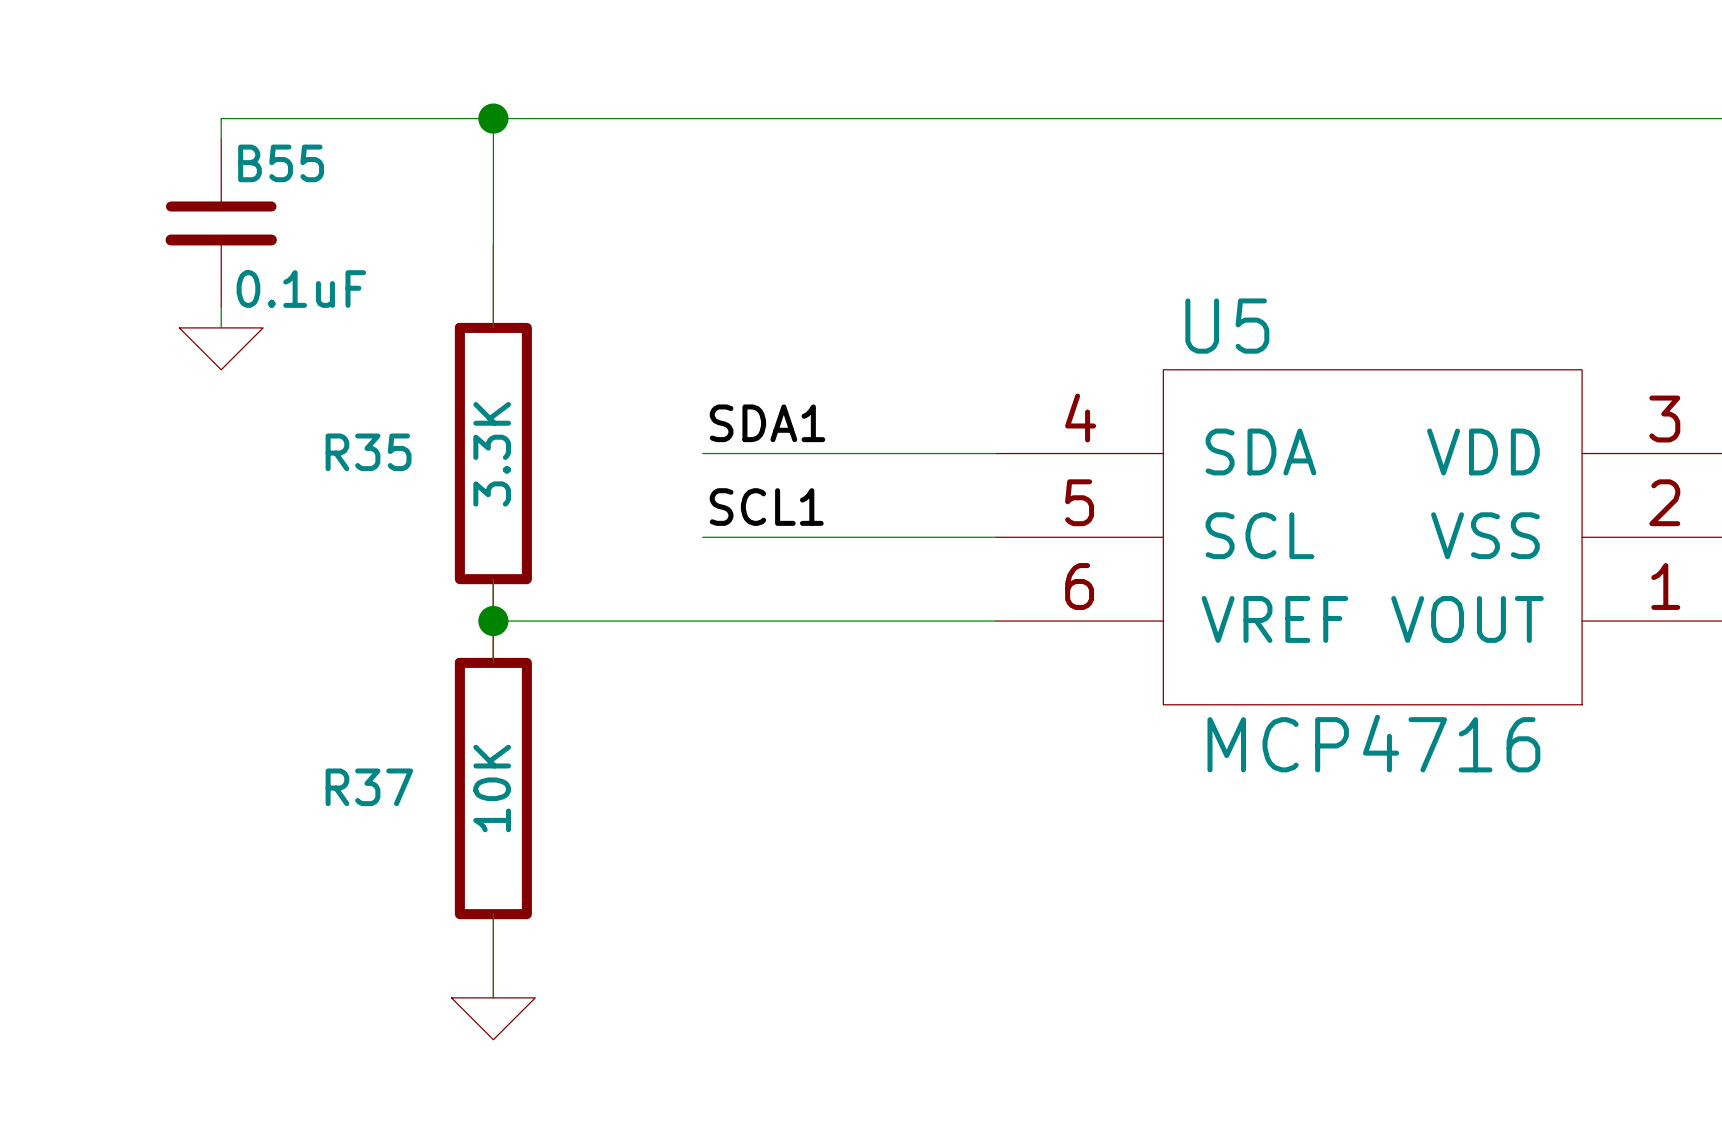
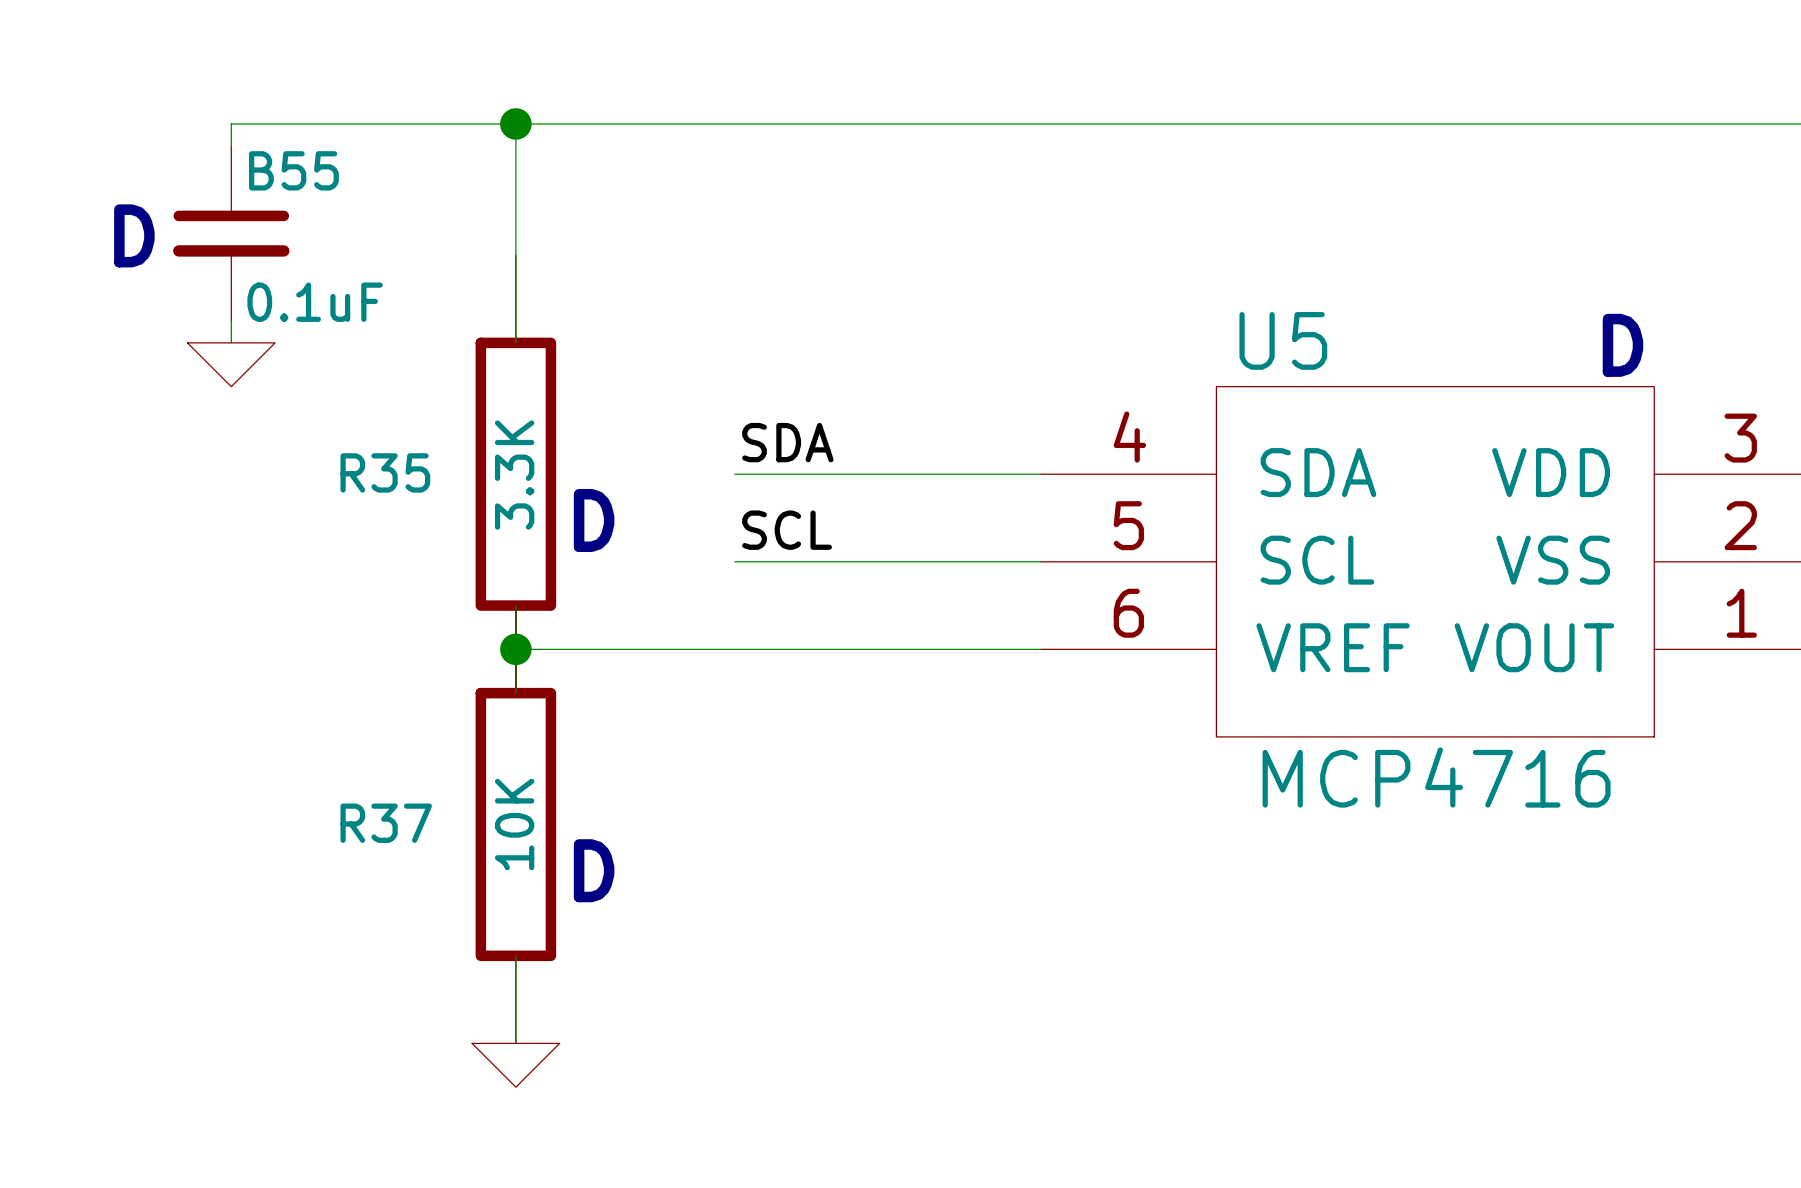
text: none -> D (134, 235)
text: none -> D (1622, 345)
label: SDA1 (767, 423) -> SDA (787, 442)
text: none -> D (594, 520)
label: SCL1 (766, 507) -> SCL (787, 530)
text: none -> D (594, 870)

